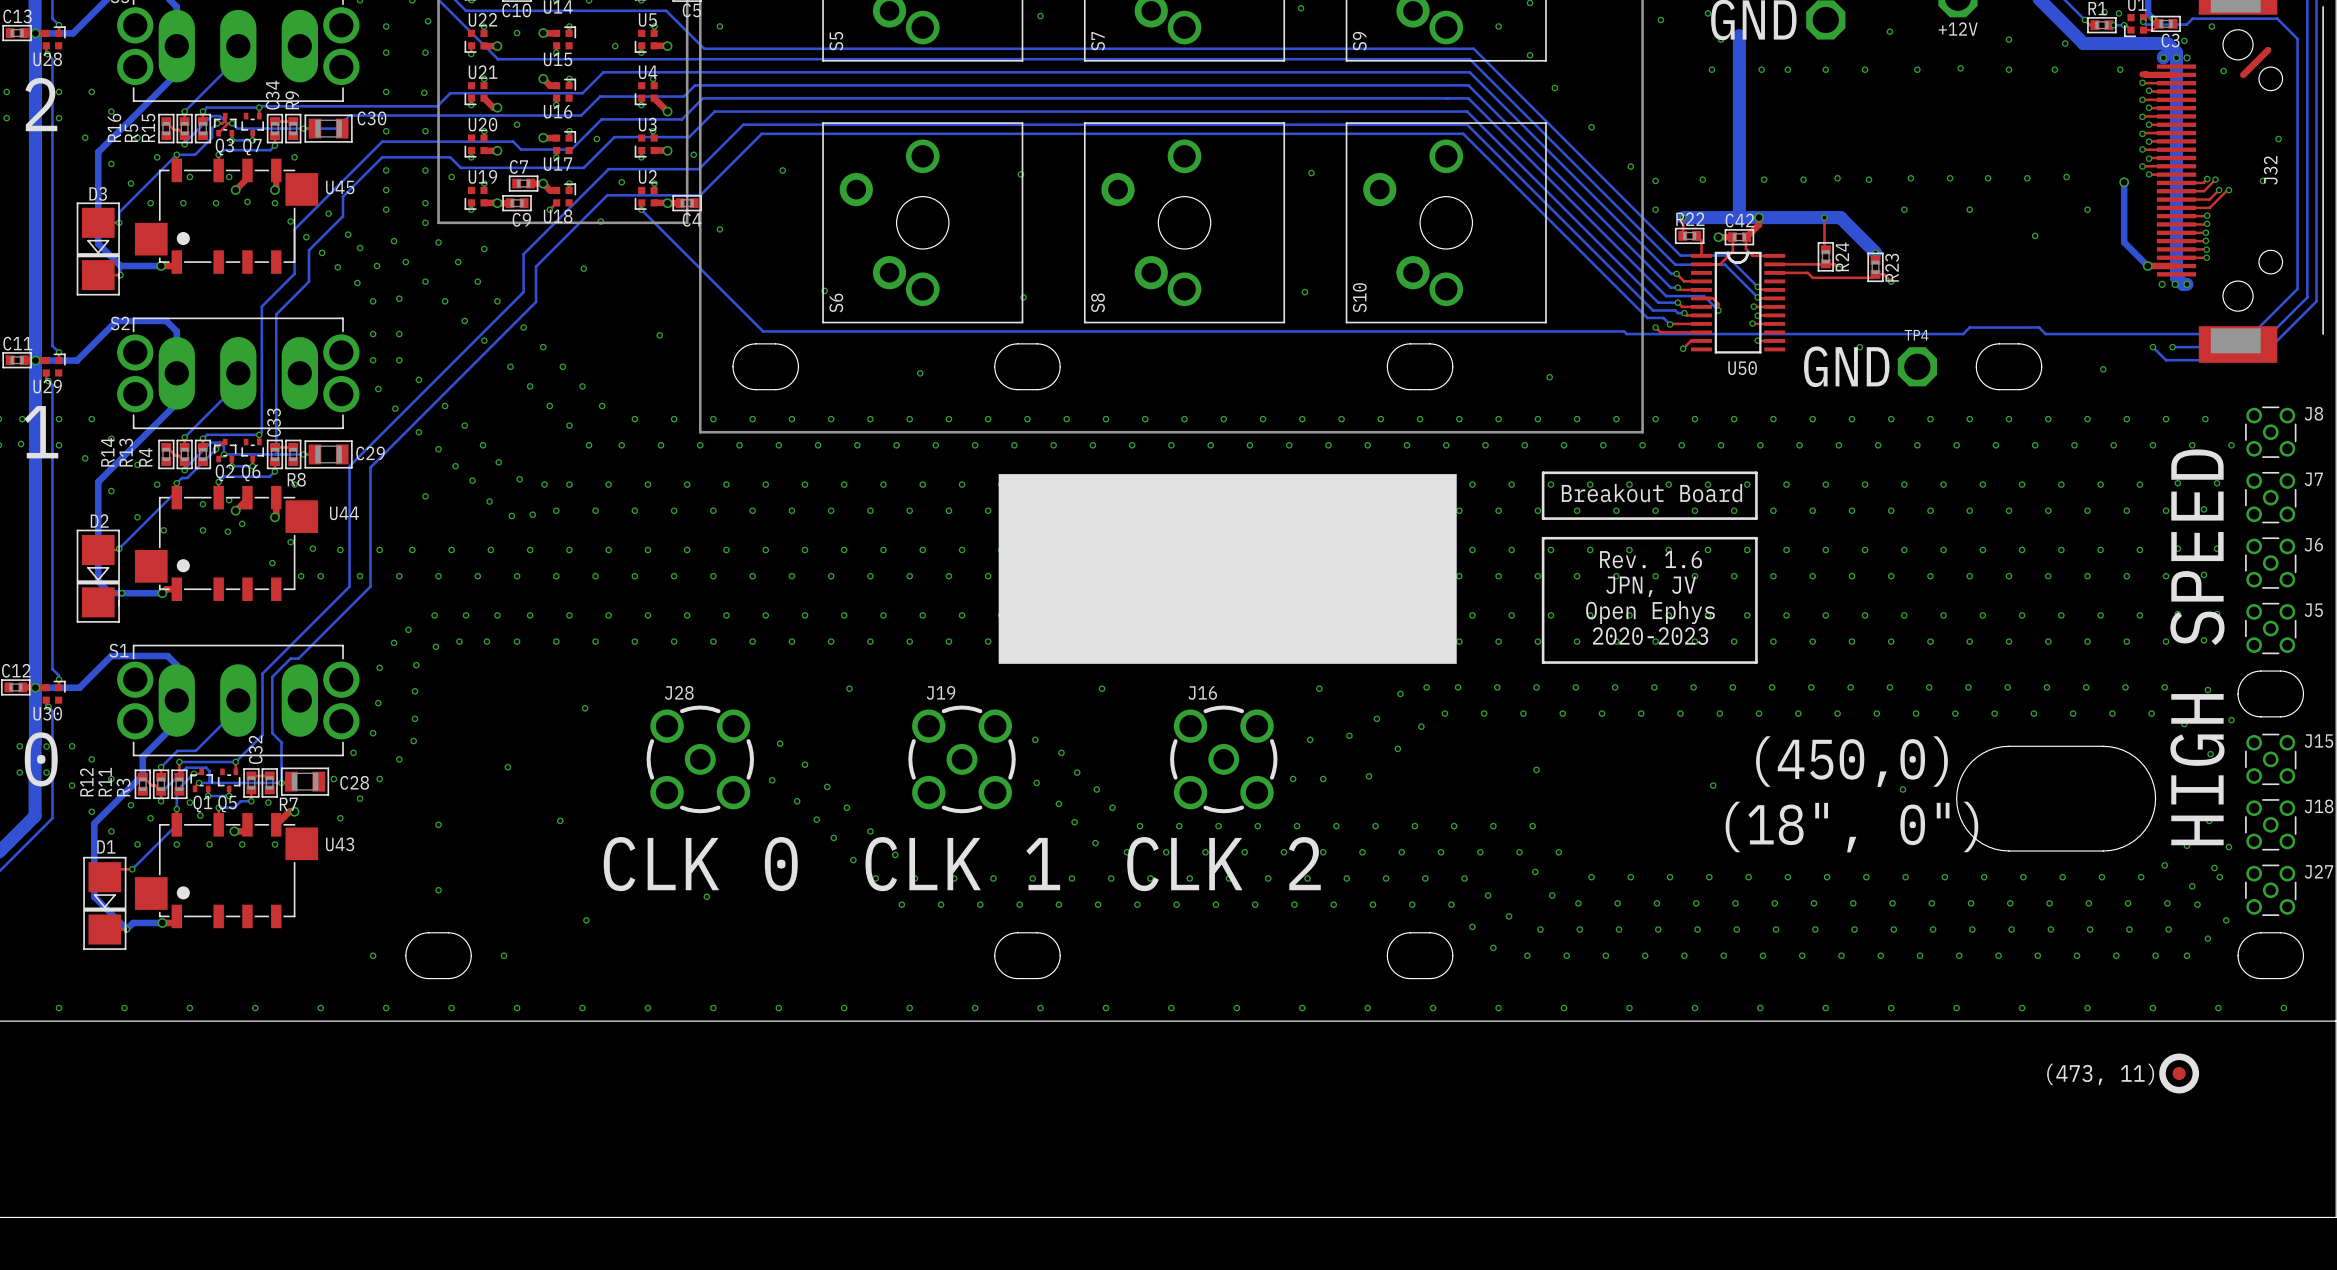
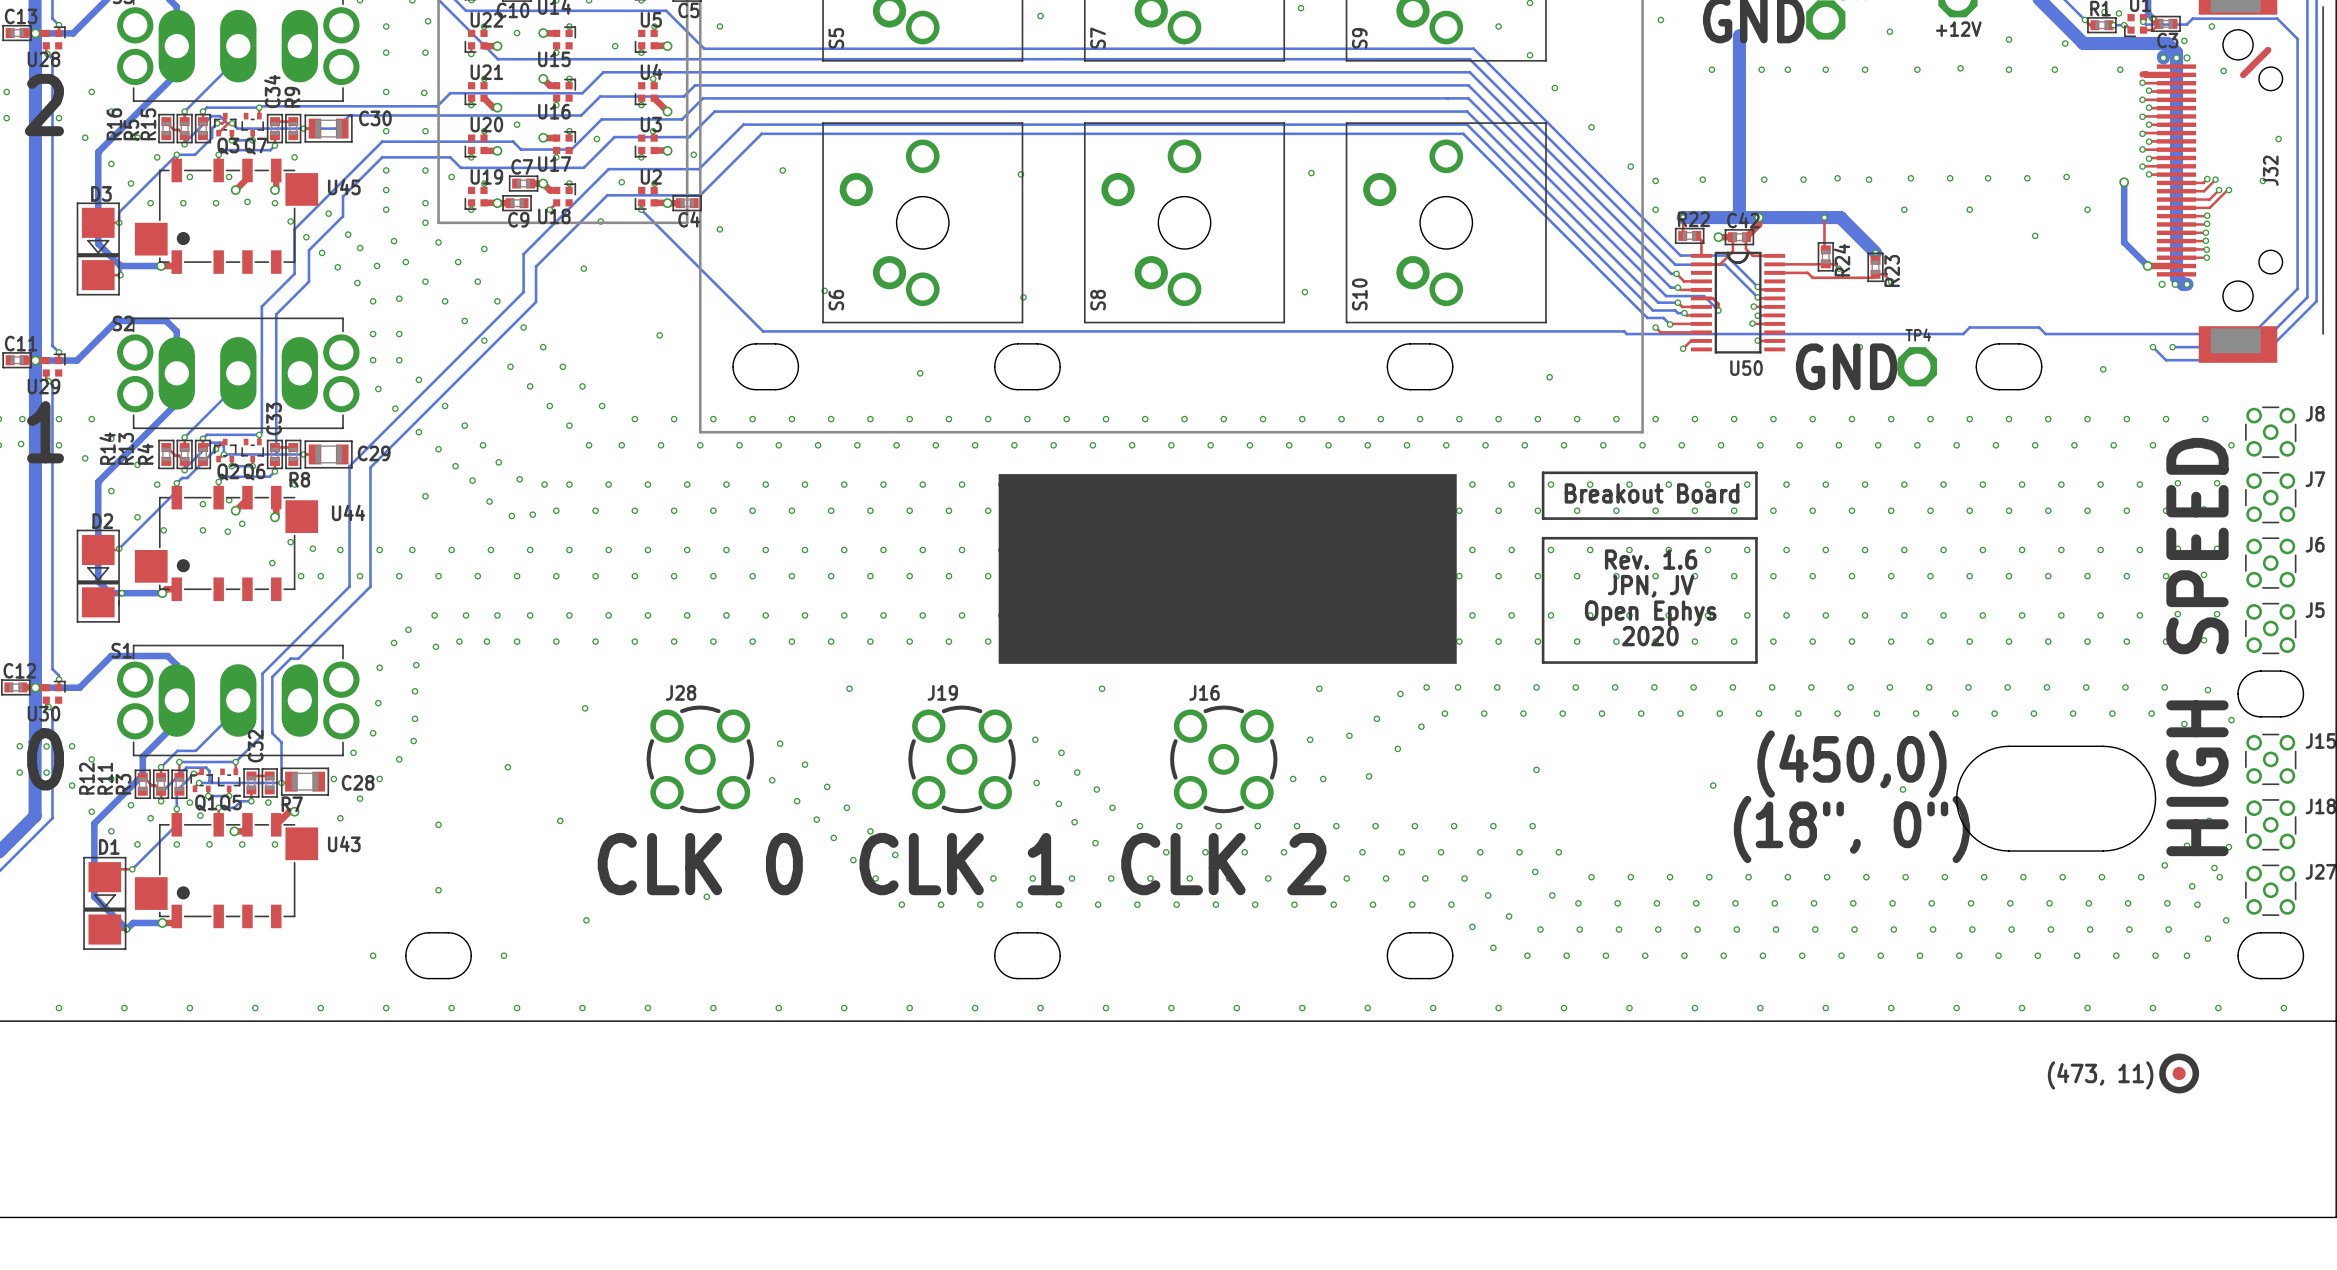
text: 2020-2023 (1650, 636) -> 2020 (1650, 636)

